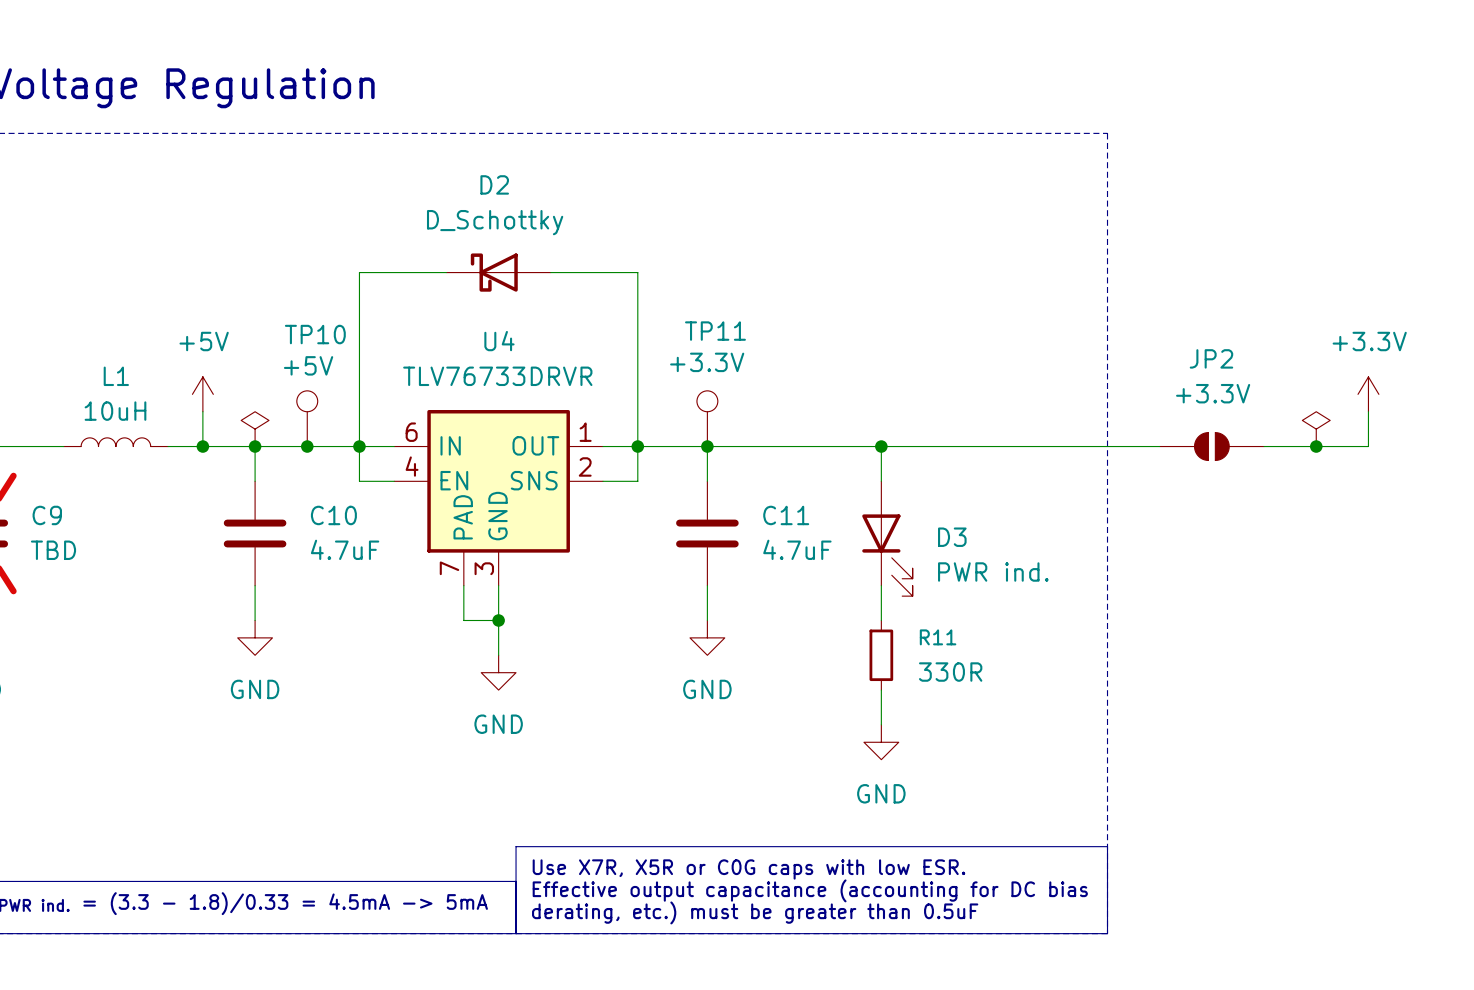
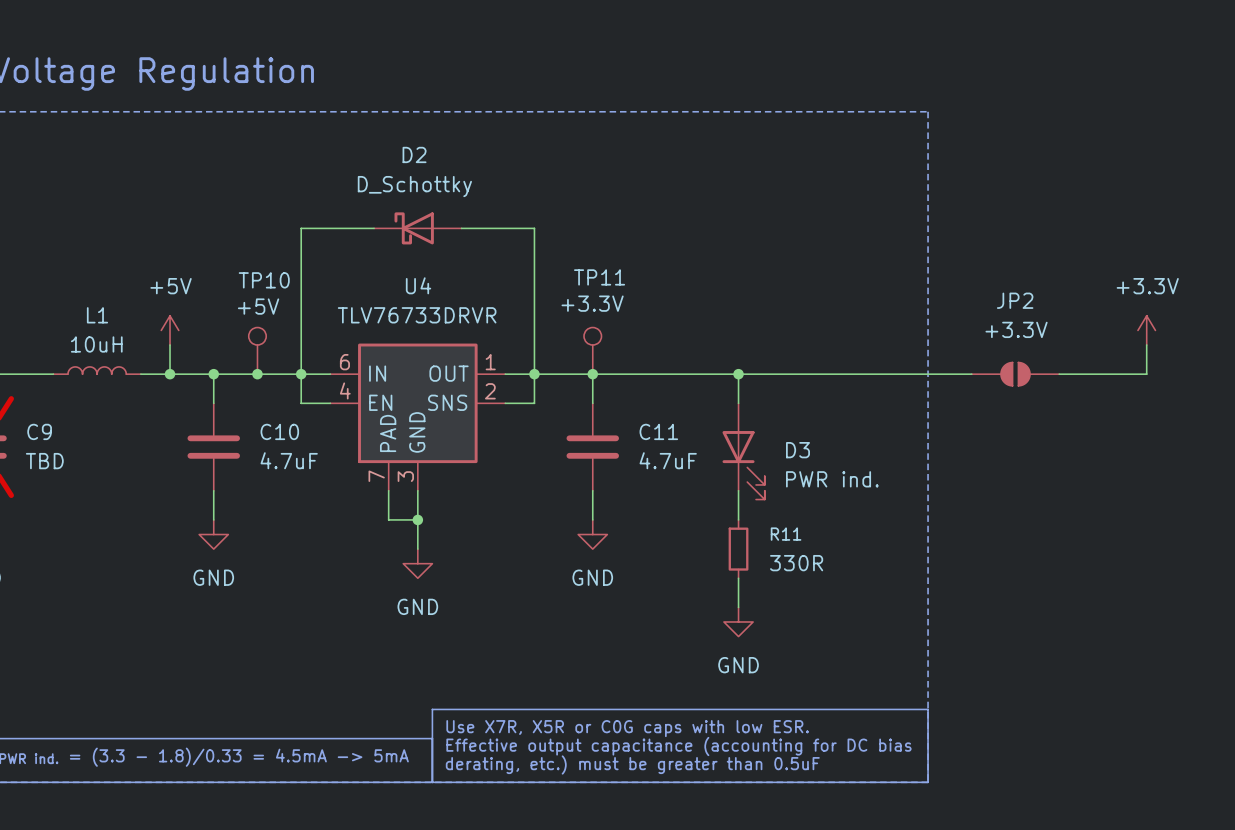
power symbol: (255, 429) -> none
power symbol: (1316, 429) -> none
junction: (1316, 446) -> none

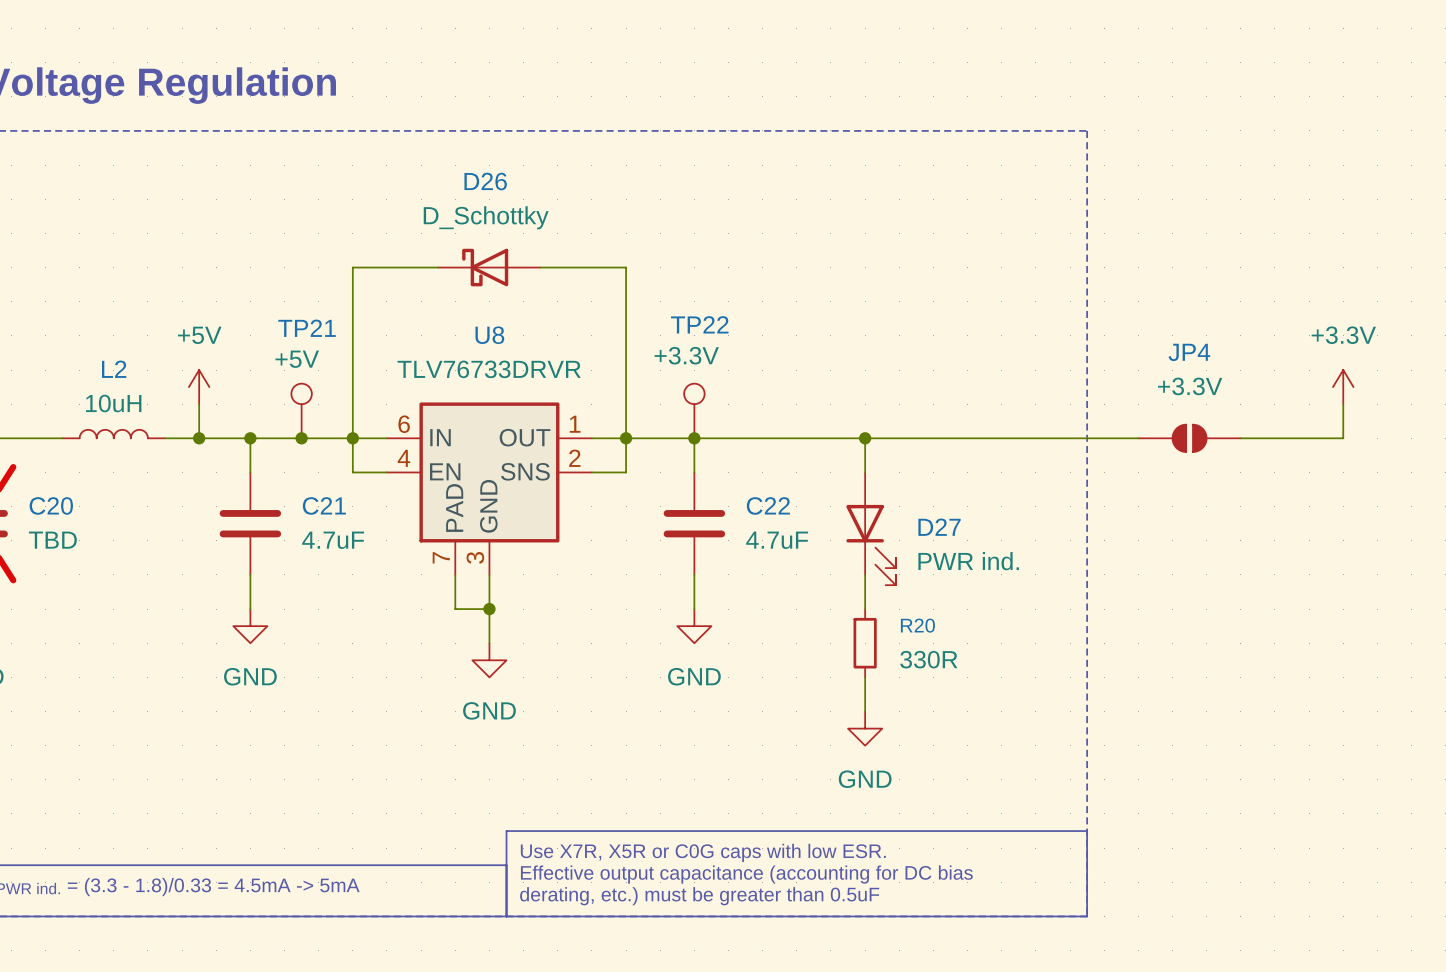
D2 name: D2 (414, 154) -> D26 (485, 181)
TP11 name: TP11 (599, 277) -> TP22 (699, 324)
TP10 name: TP10 (264, 280) -> TP21 (307, 328)
U4 name: U4 (418, 285) -> U8 (489, 335)
JP2 name: JP2 (1015, 300) -> JP4 (1189, 352)
L1 name: L1 (97, 315) -> L2 (114, 369)
C9 name: C9 (39, 431) -> C20 (51, 505)
C10 name: C10 (279, 431) -> C21 (324, 505)
C11 name: C11 (658, 431) -> C22 (768, 505)
D3 name: D3 (797, 450) -> D27 (939, 527)
R11 name: R11 (786, 534) -> R20 (917, 625)

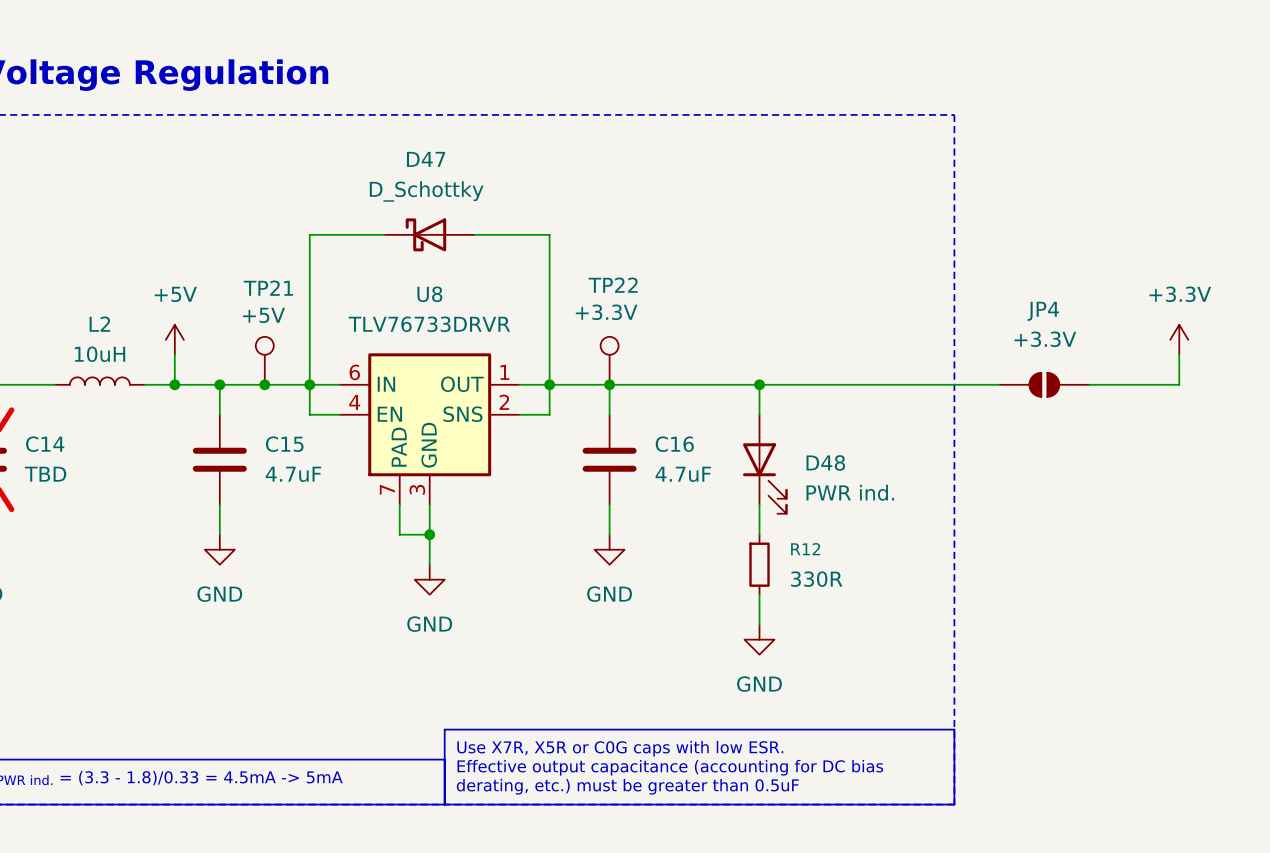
D26 name: D26 (485, 181) -> D47 (426, 159)
C20 name: C20 (51, 505) -> C14 (45, 444)
C21 name: C21 (324, 505) -> C15 (284, 444)
C22 name: C22 (768, 505) -> C16 (674, 444)
D27 name: D27 (939, 527) -> D48 (825, 462)
R20 name: R20 (917, 625) -> R12 (805, 549)

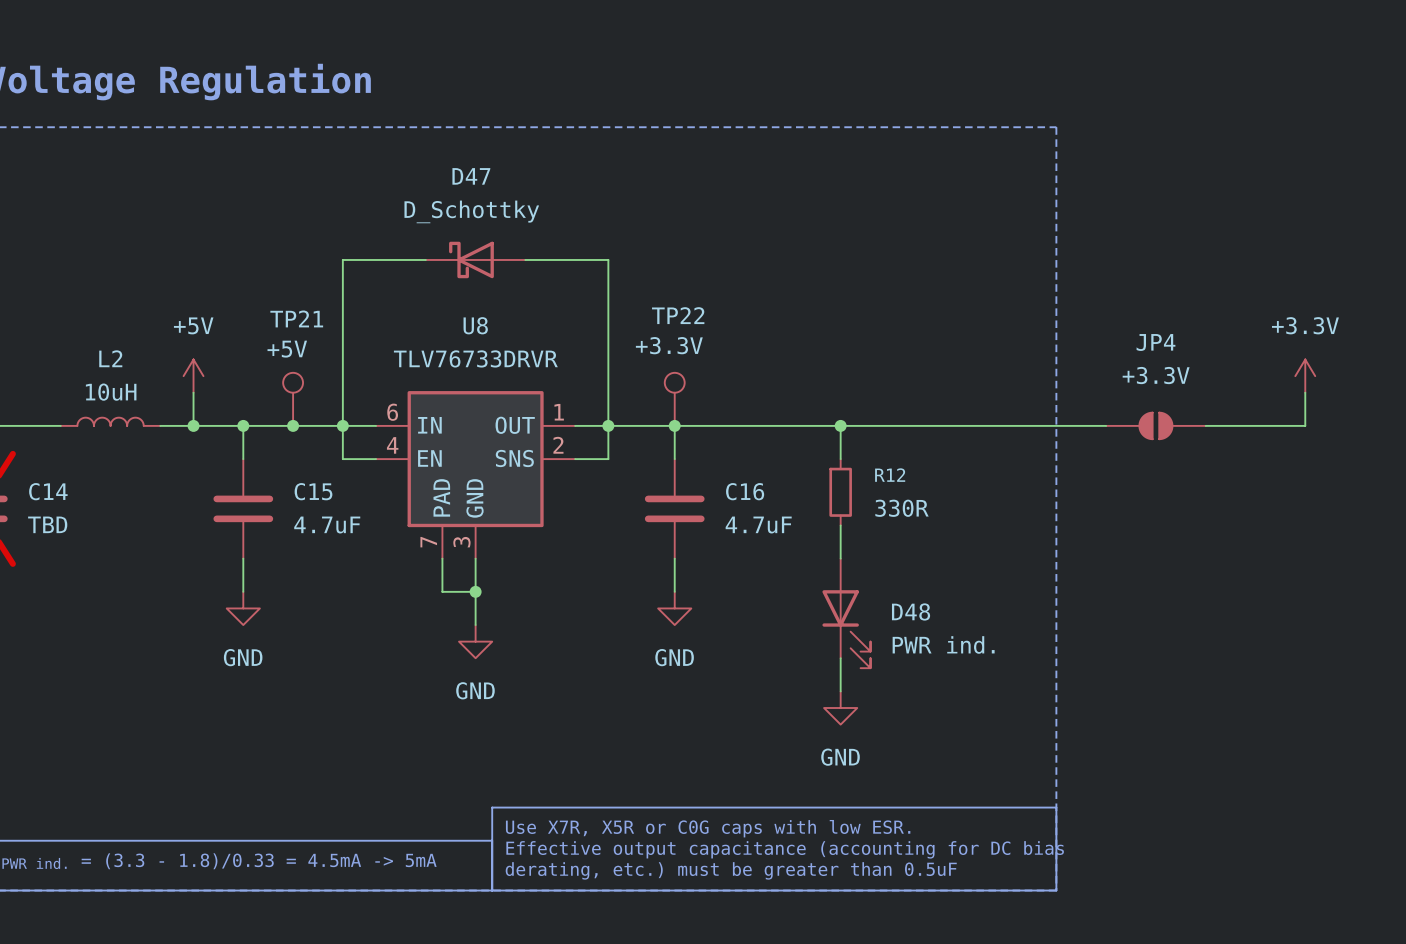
D48 position: (764, 464) -> (846, 613)
R12 position: (759, 564) -> (840, 492)

